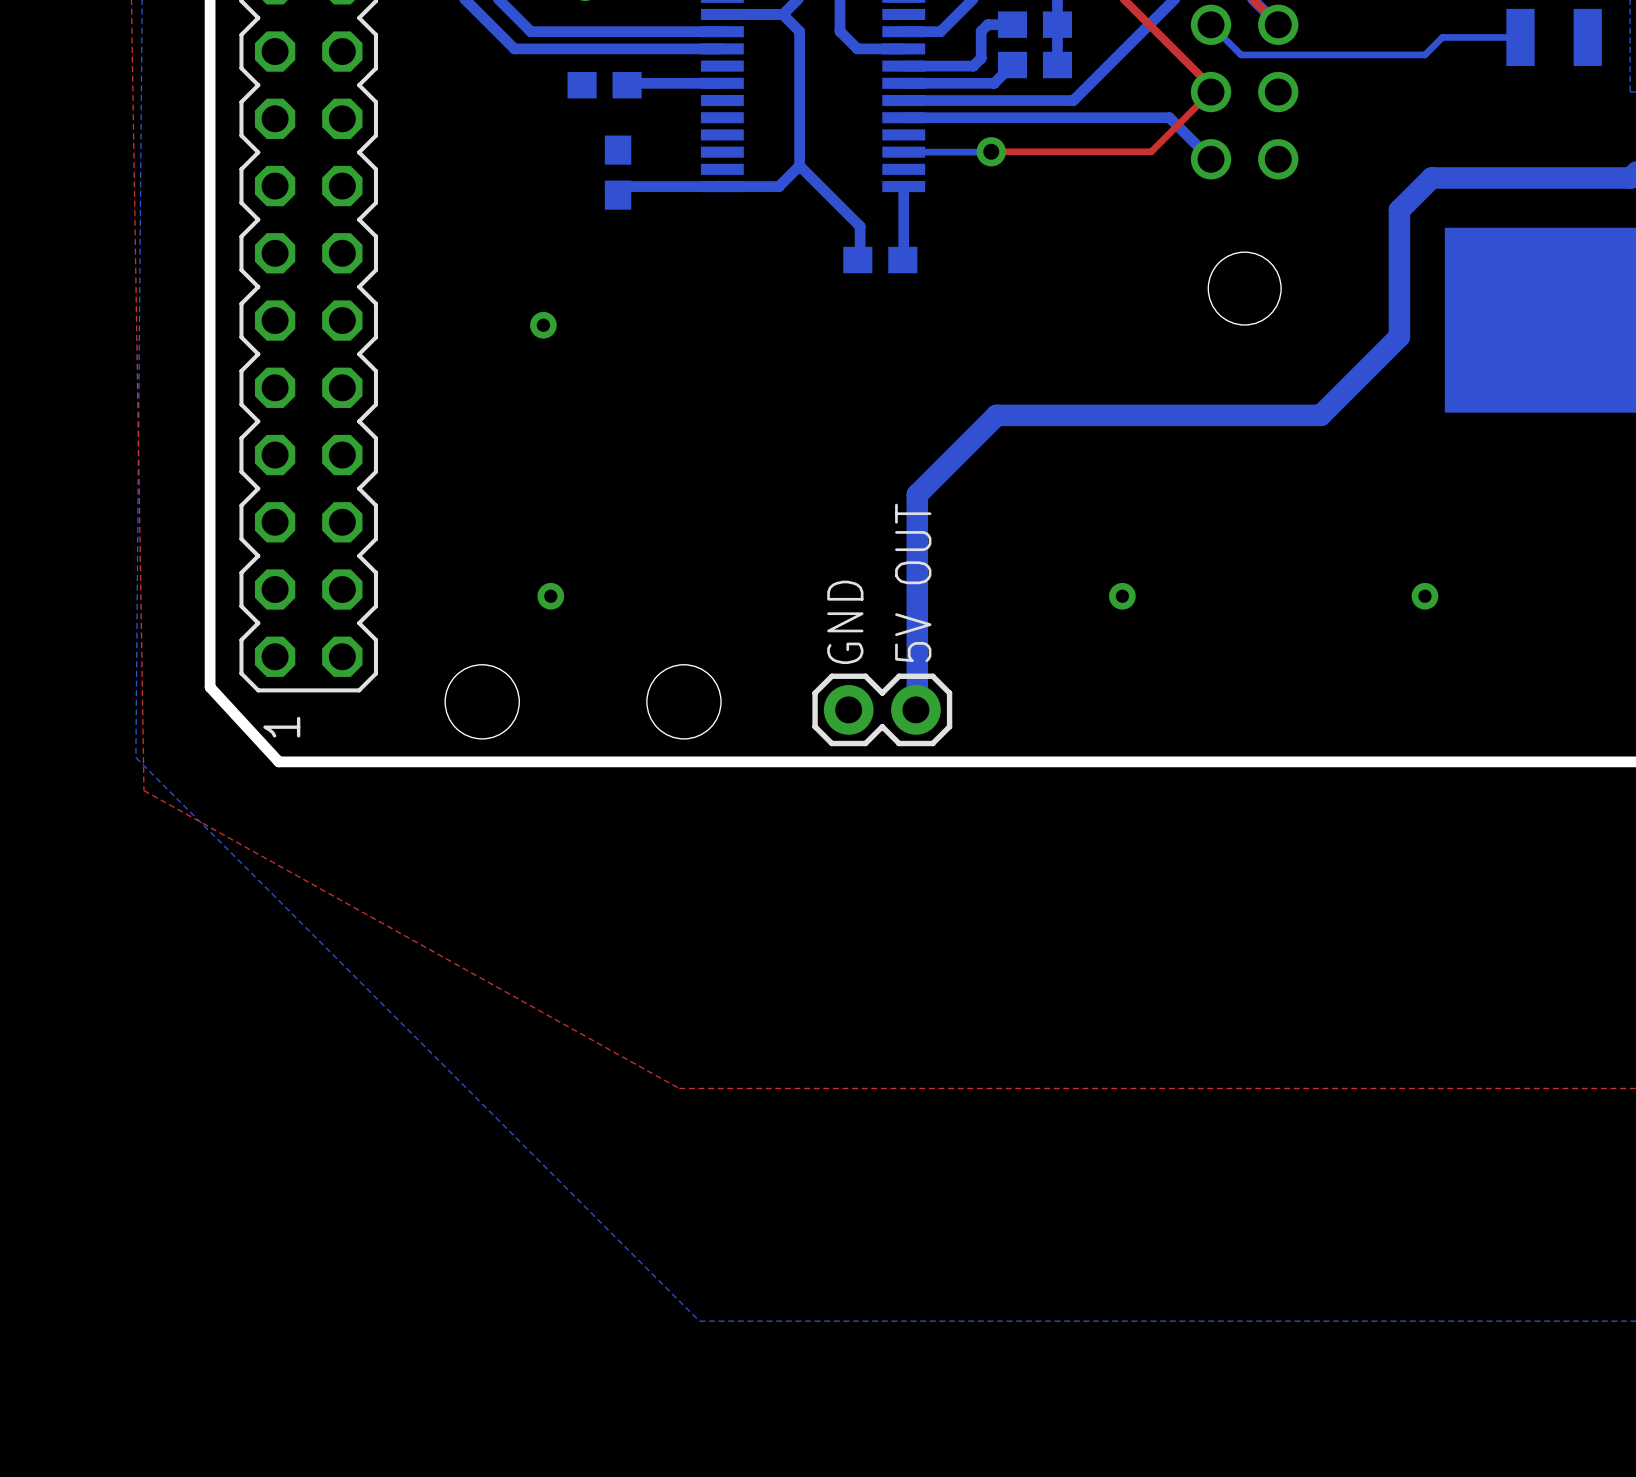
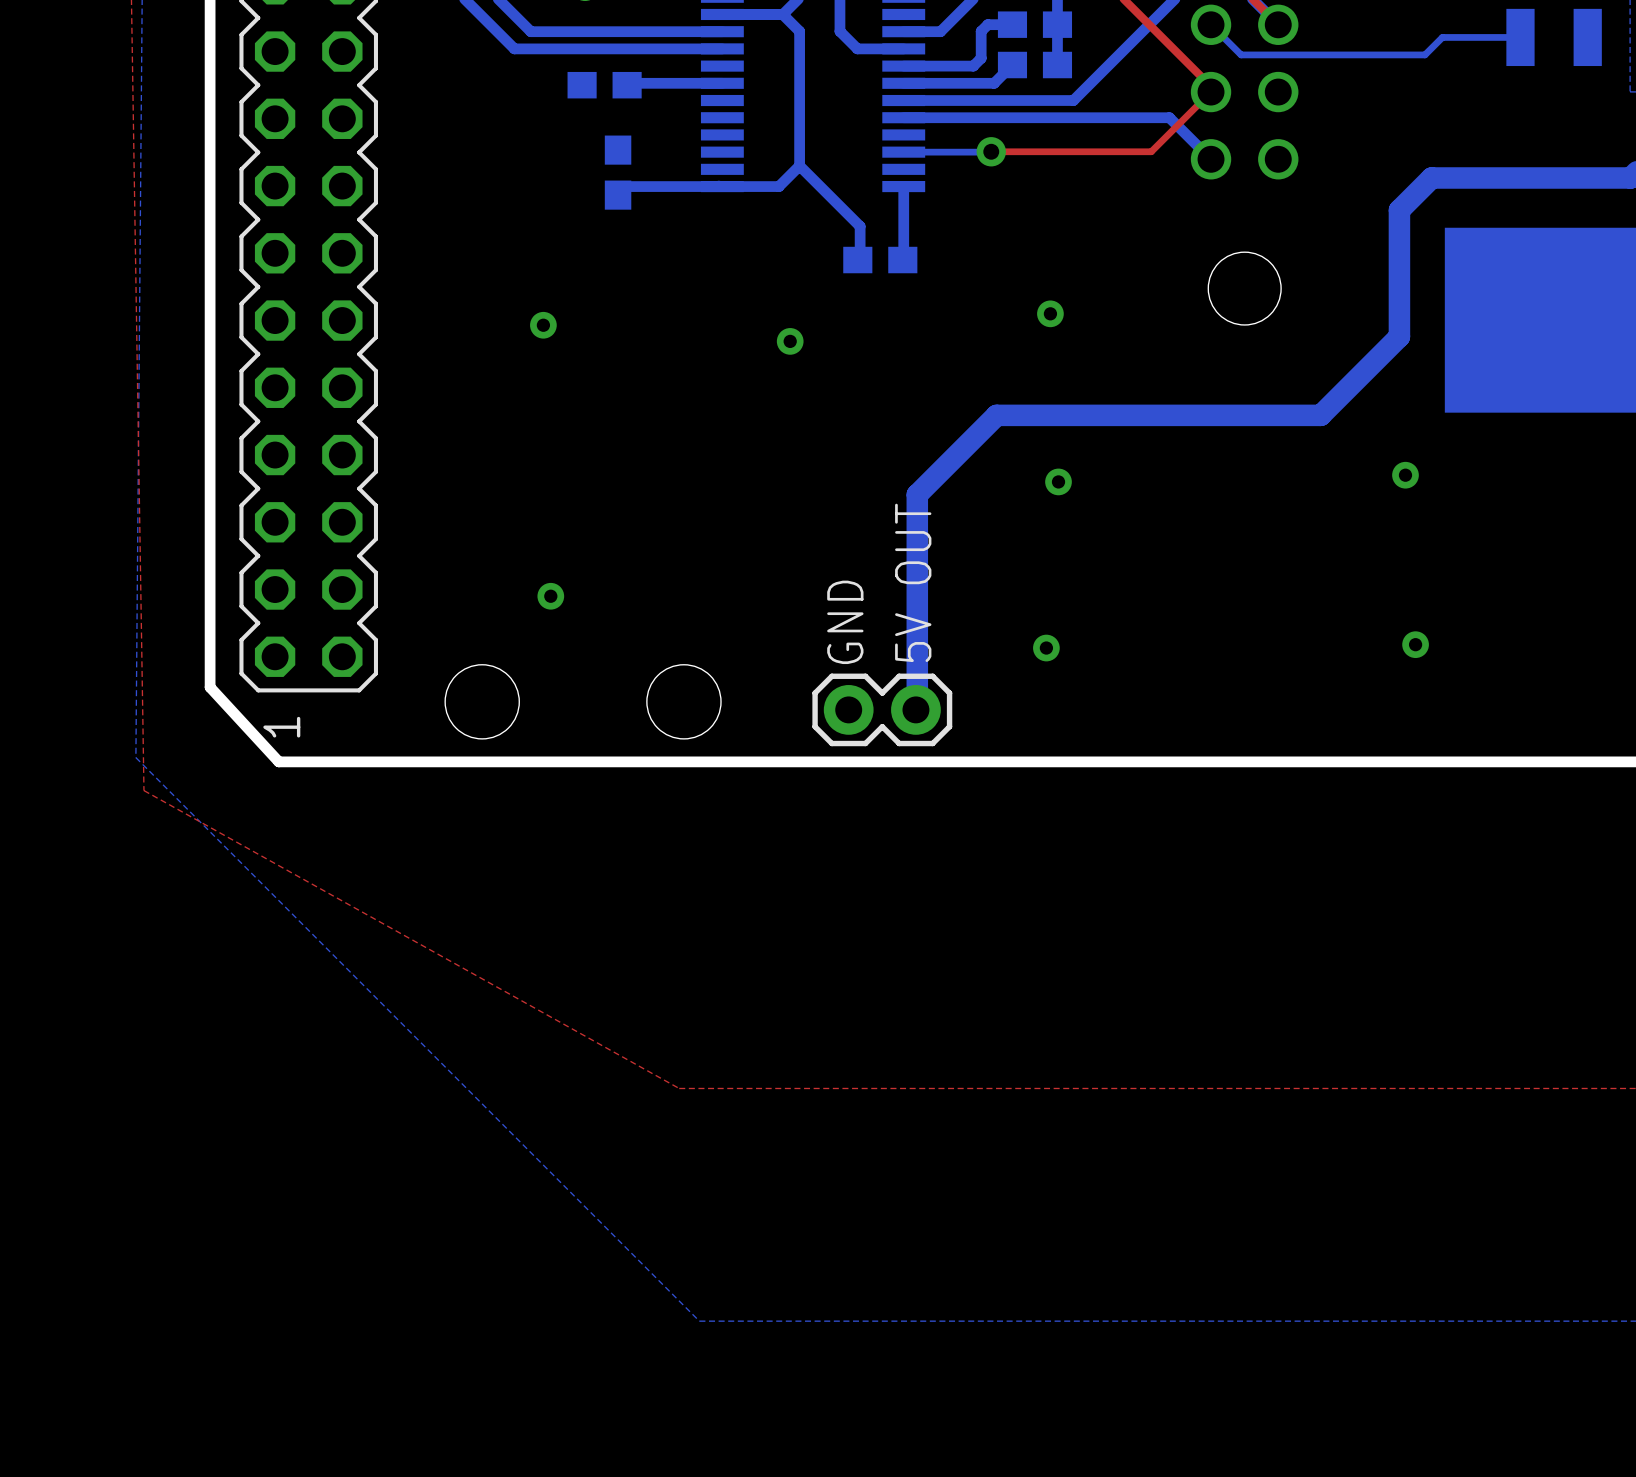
via: none -> (1050, 313)
via: none -> (790, 341)
via: none -> (1405, 475)
via: none -> (1058, 481)
via: (1122, 596) -> none
via position: (1424, 596) -> (1415, 644)
via: none -> (1046, 648)

